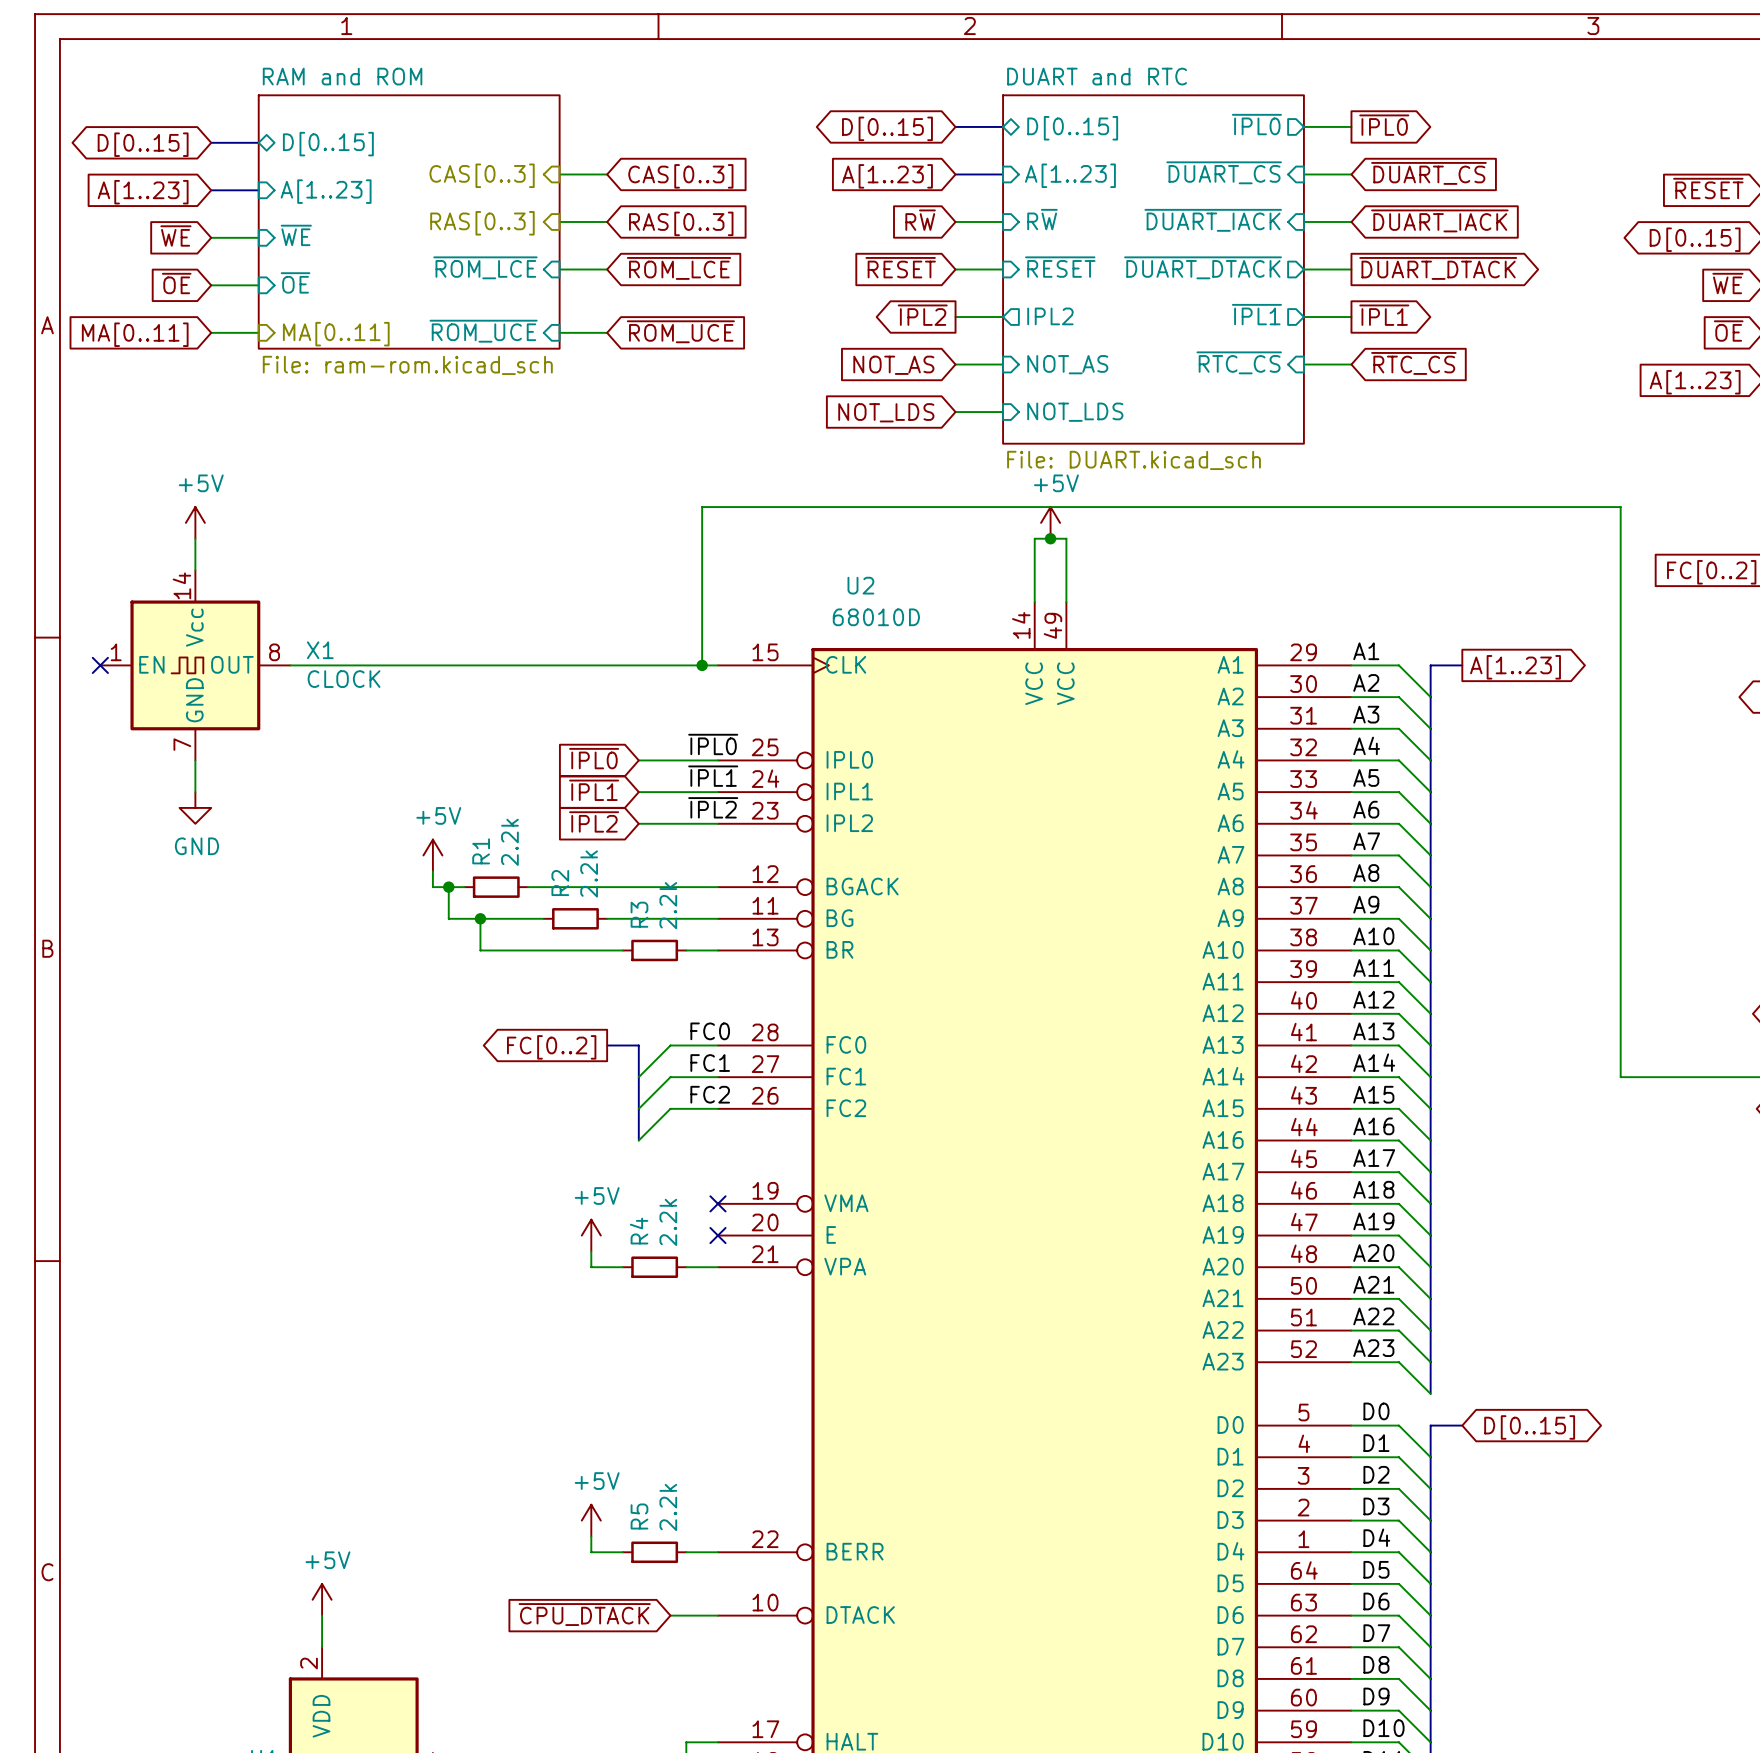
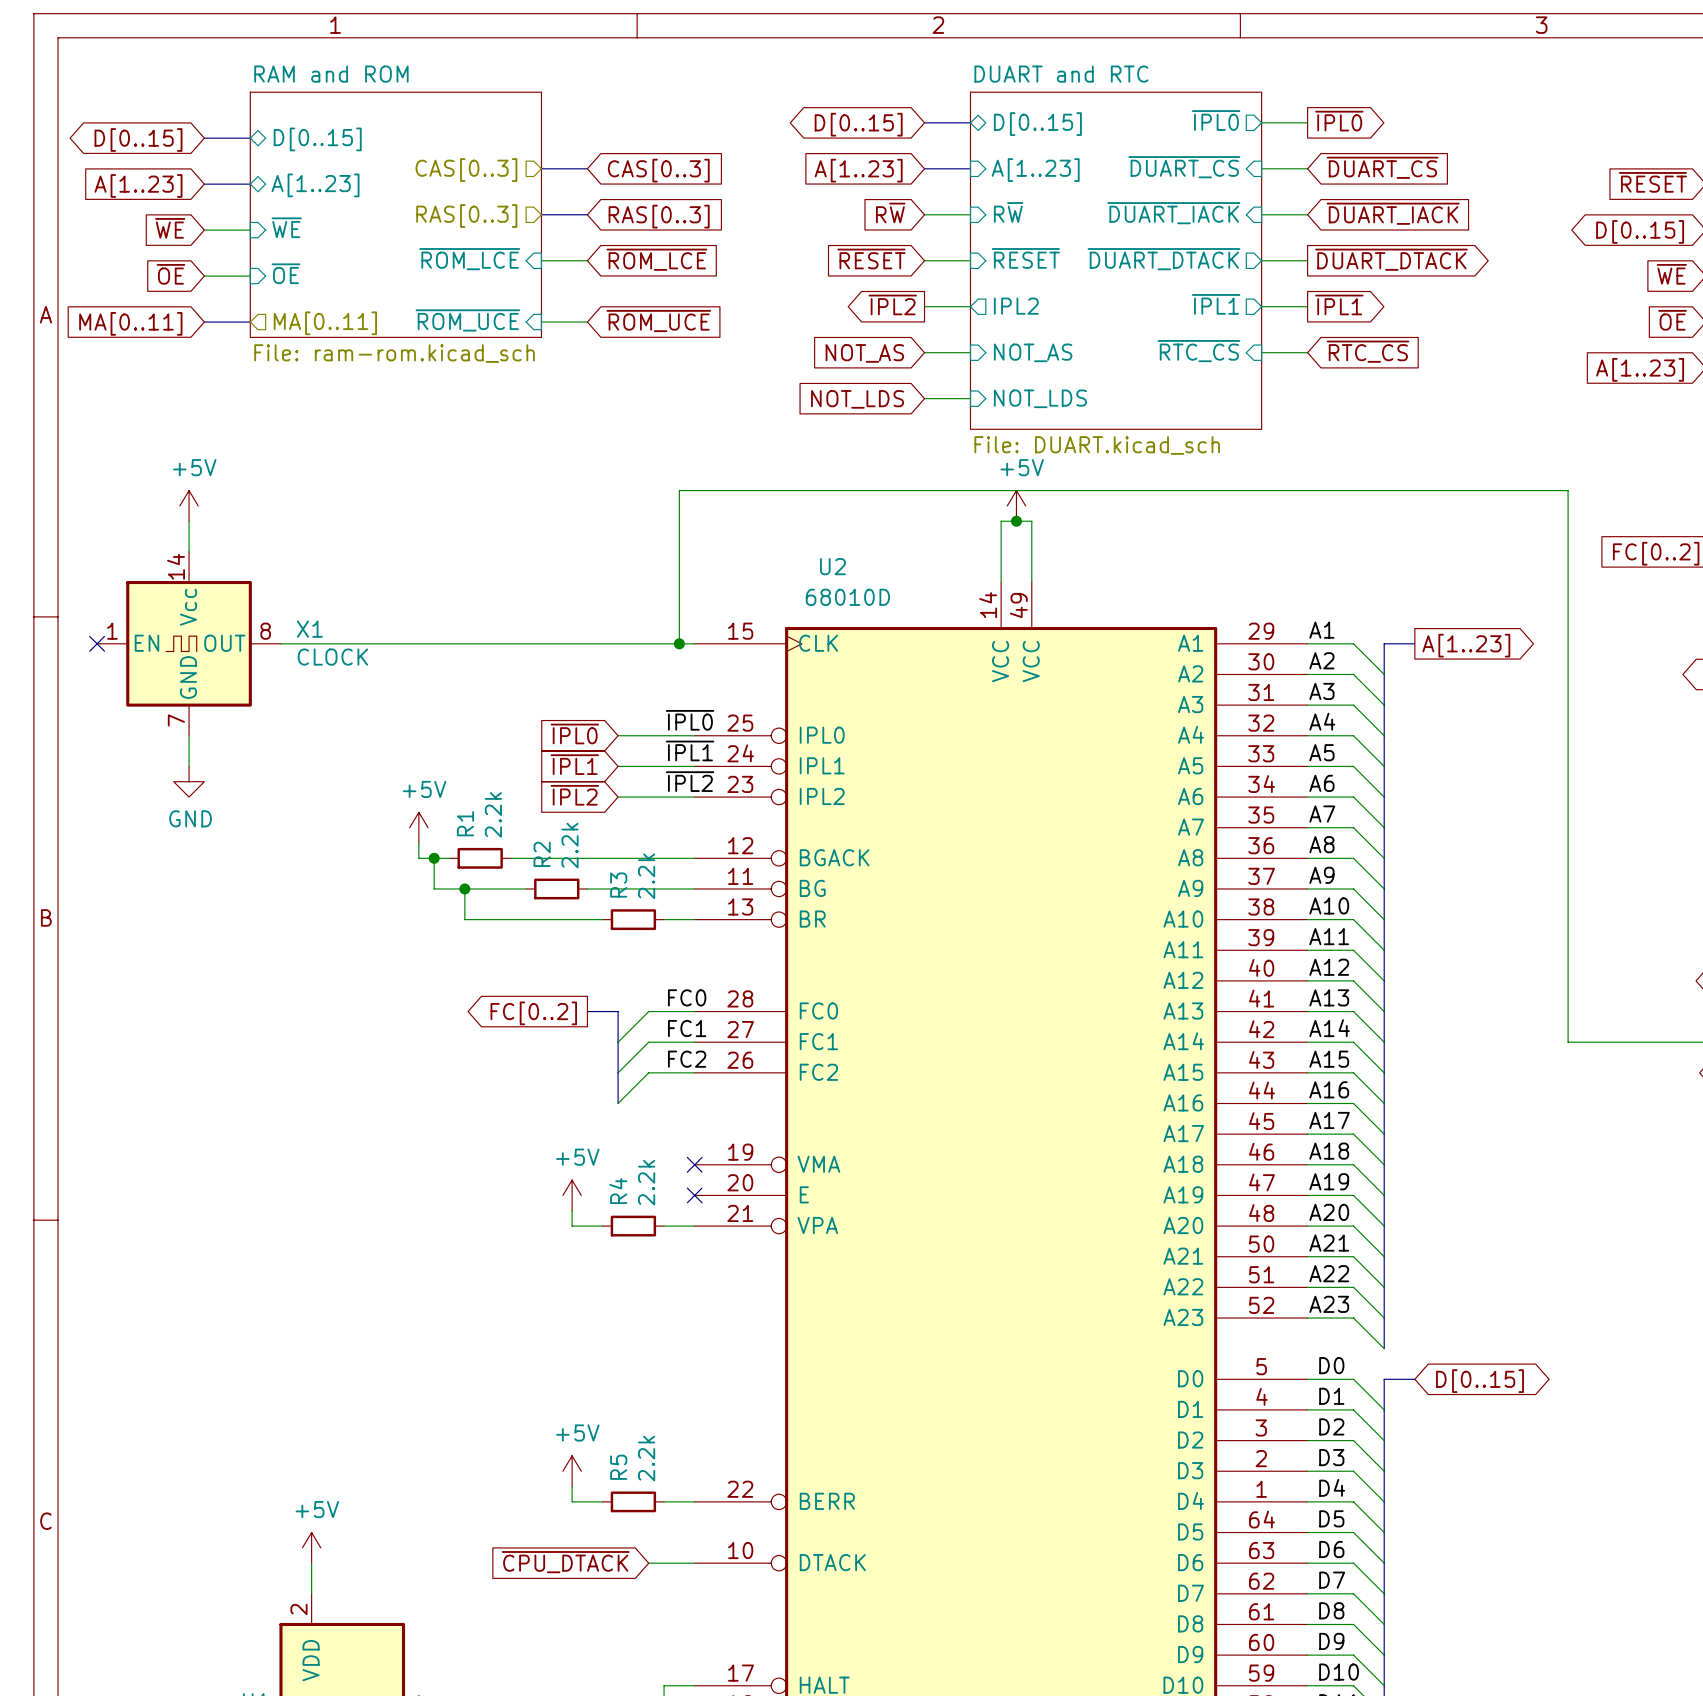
bus: none -> (541, 168) (587, 168)
hierarchical label shape: output (482, 175) -> input (466, 170)
sheet pin shape: input (326, 191) -> bidirectional (315, 185)
bus: none -> (541, 214) (587, 214)
hierarchical label shape: output (482, 223) -> input (466, 216)
bus: none -> (204, 322) (250, 322)
hierarchical label shape: output (336, 334) -> input (325, 323)

